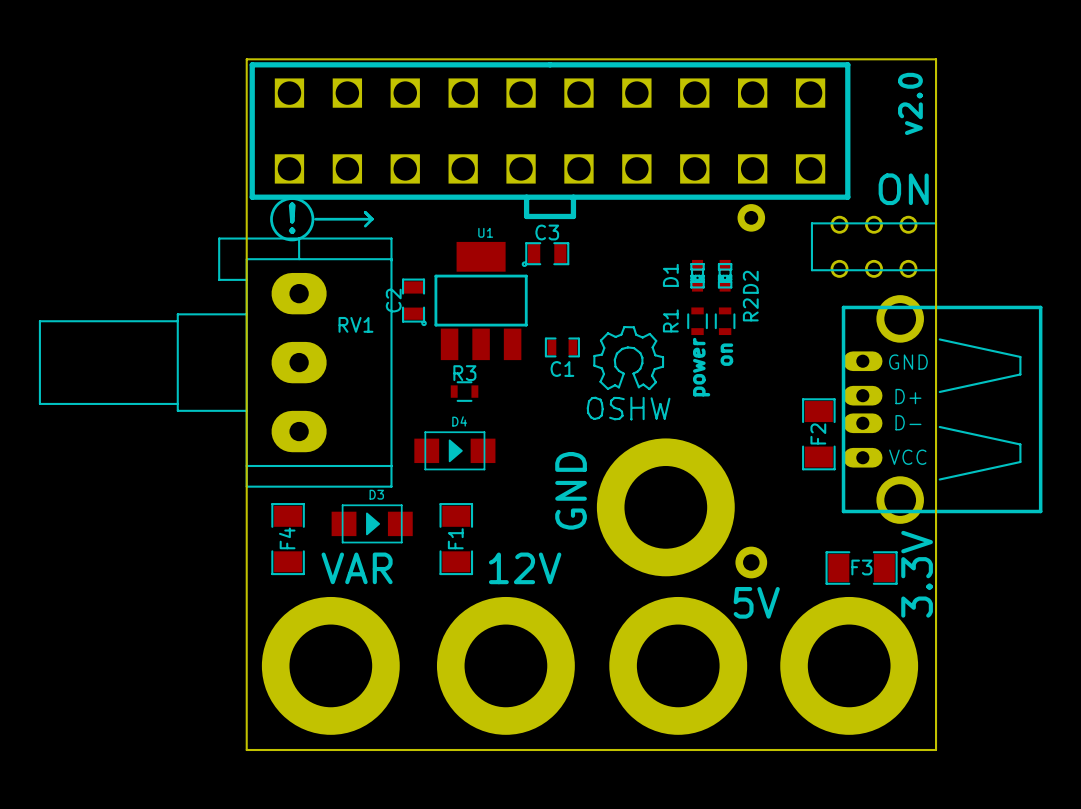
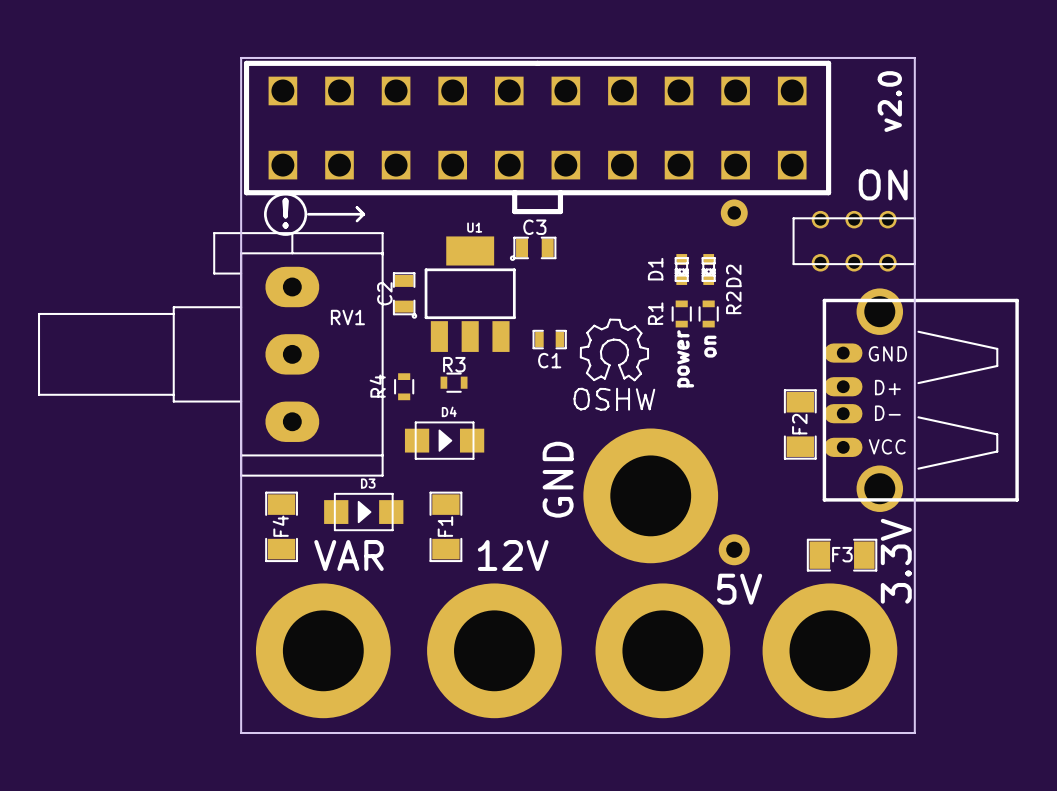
R4: none -> (404, 386)

